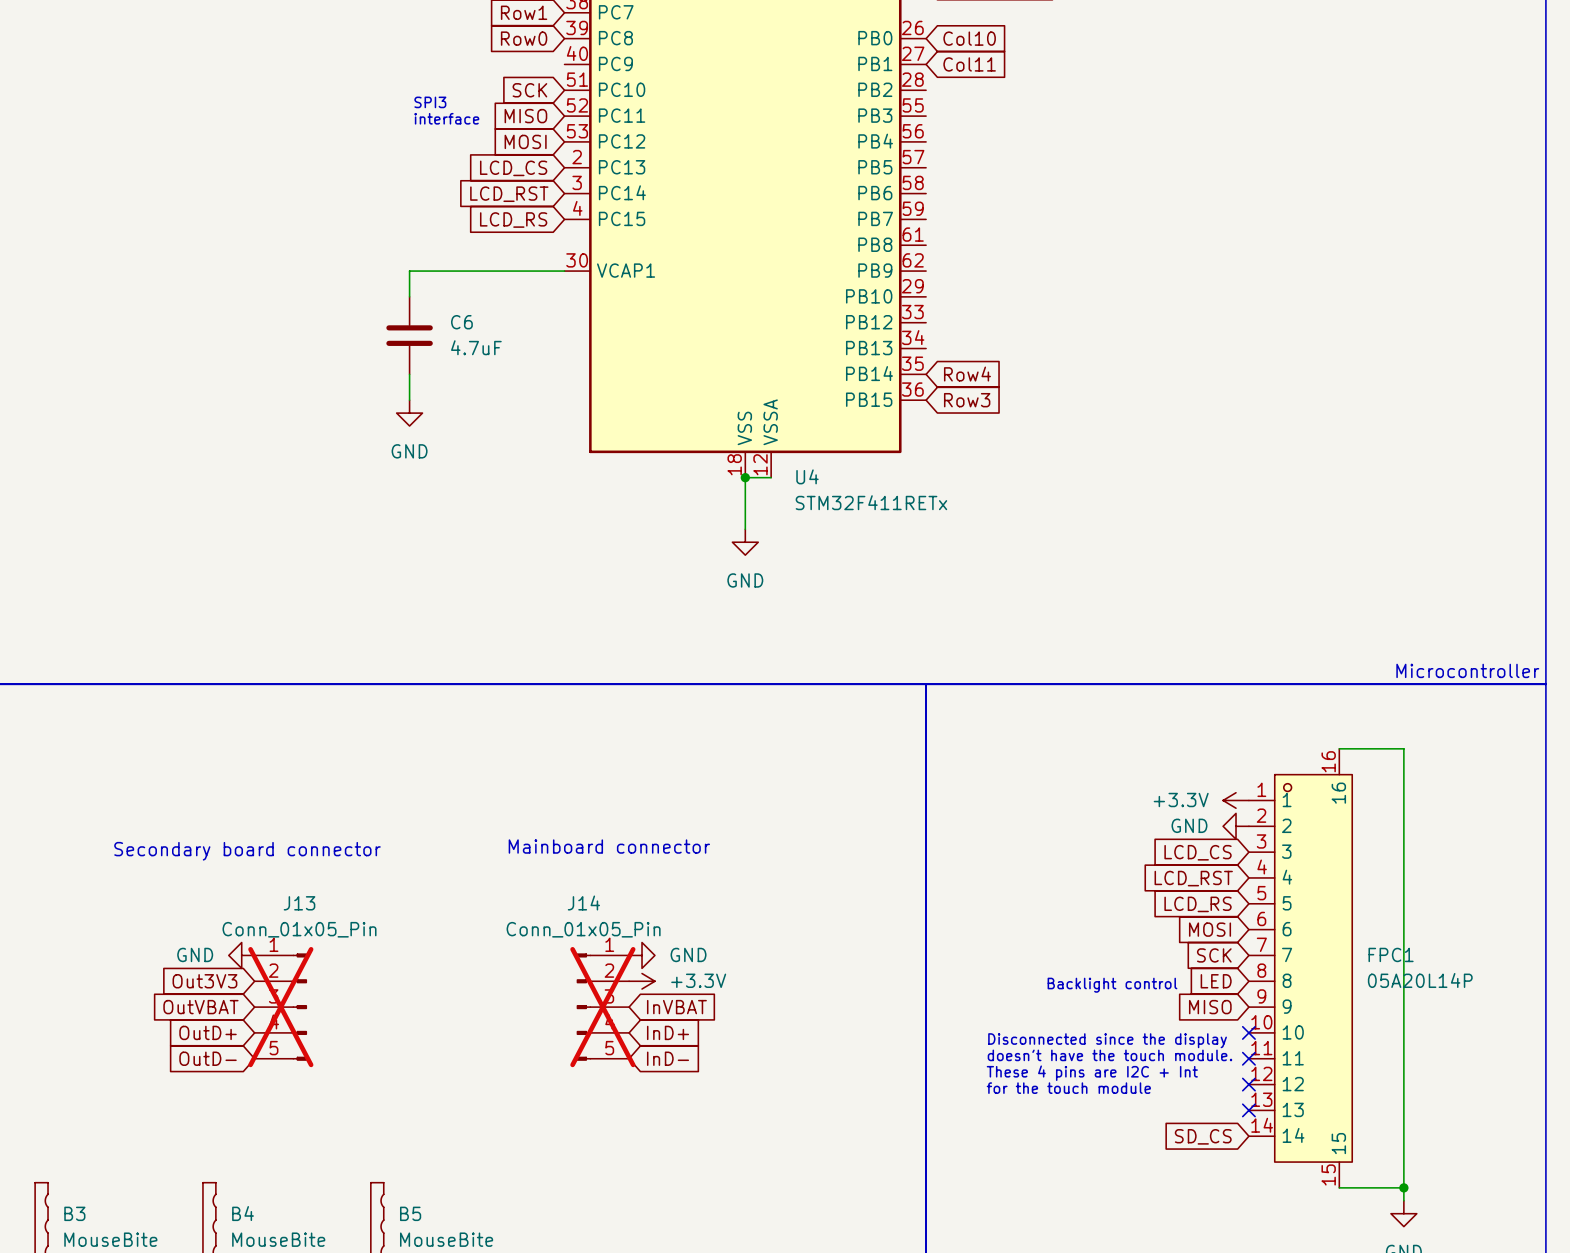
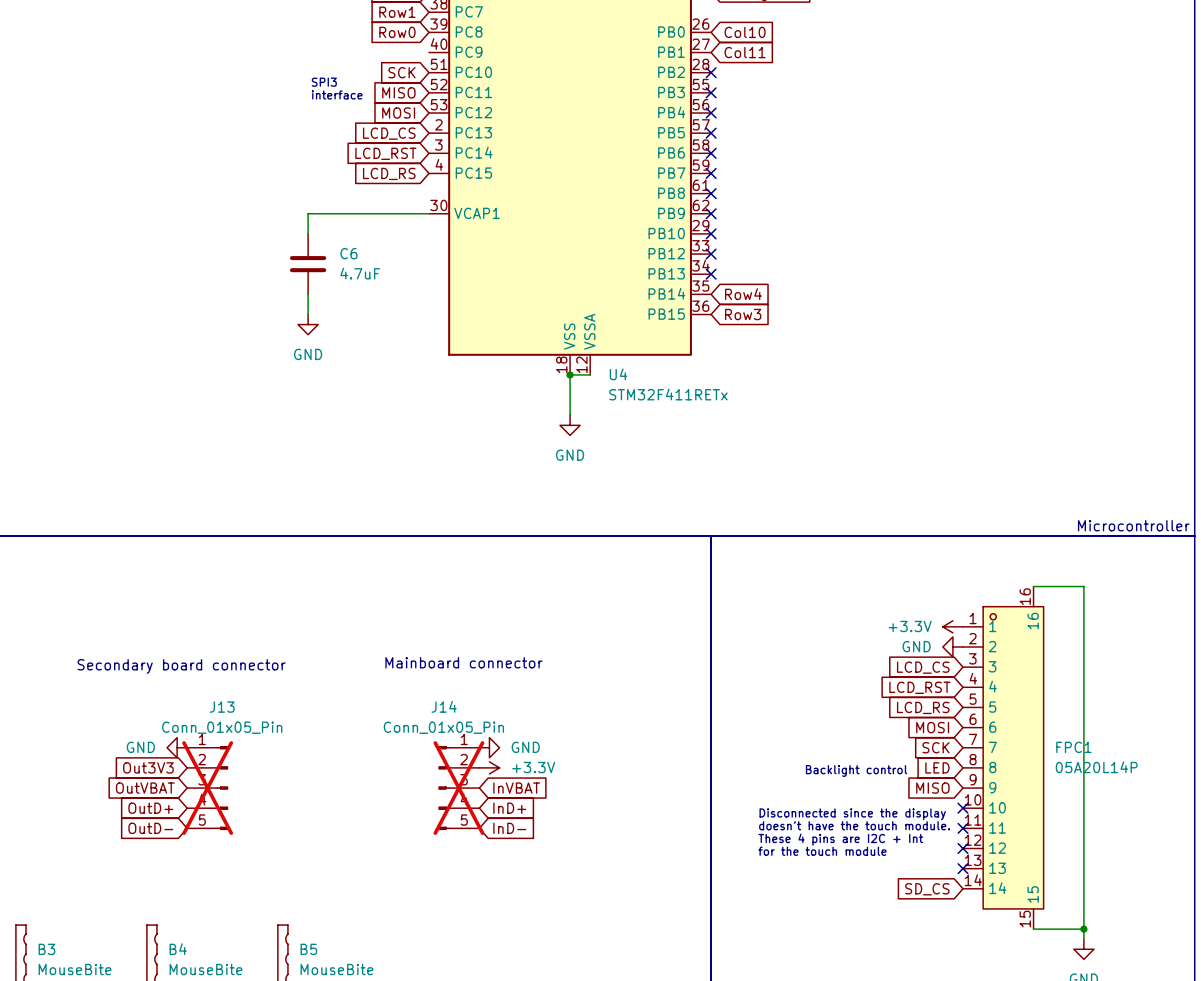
no-connect mark: none -> (711, 72)
no-connect mark: none -> (711, 92)
no-connect mark: none -> (711, 113)
no-connect mark: none -> (711, 133)
no-connect mark: none -> (711, 153)
no-connect mark: none -> (711, 173)
no-connect mark: none -> (711, 193)
no-connect mark: none -> (711, 213)
no-connect mark: none -> (711, 233)
no-connect mark: none -> (711, 254)
no-connect mark: none -> (711, 274)

